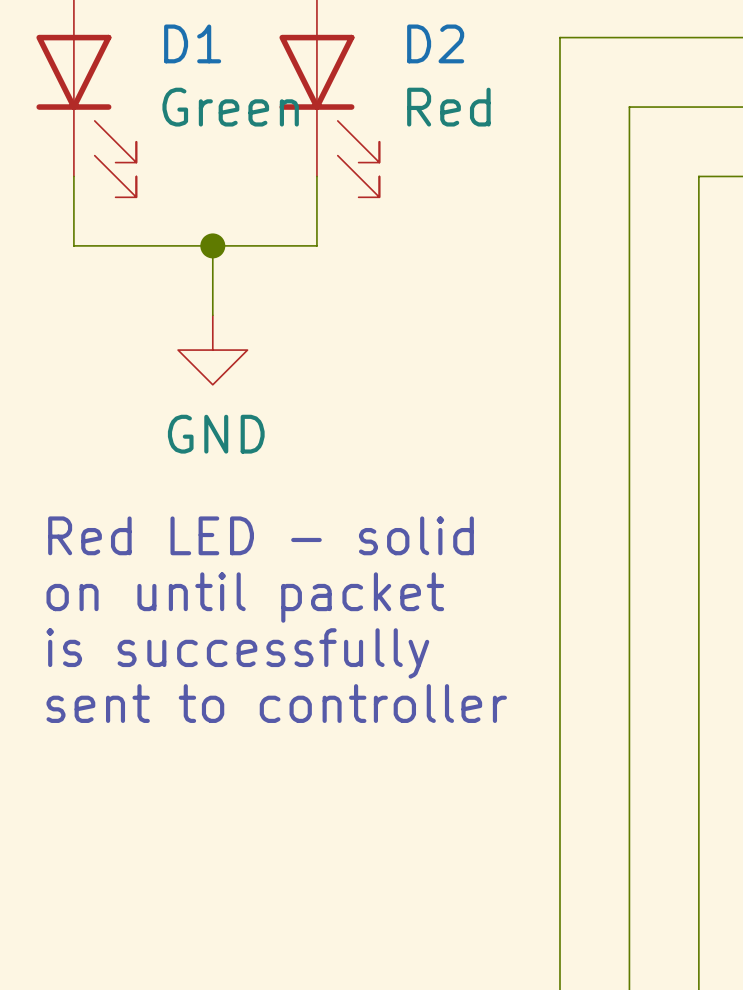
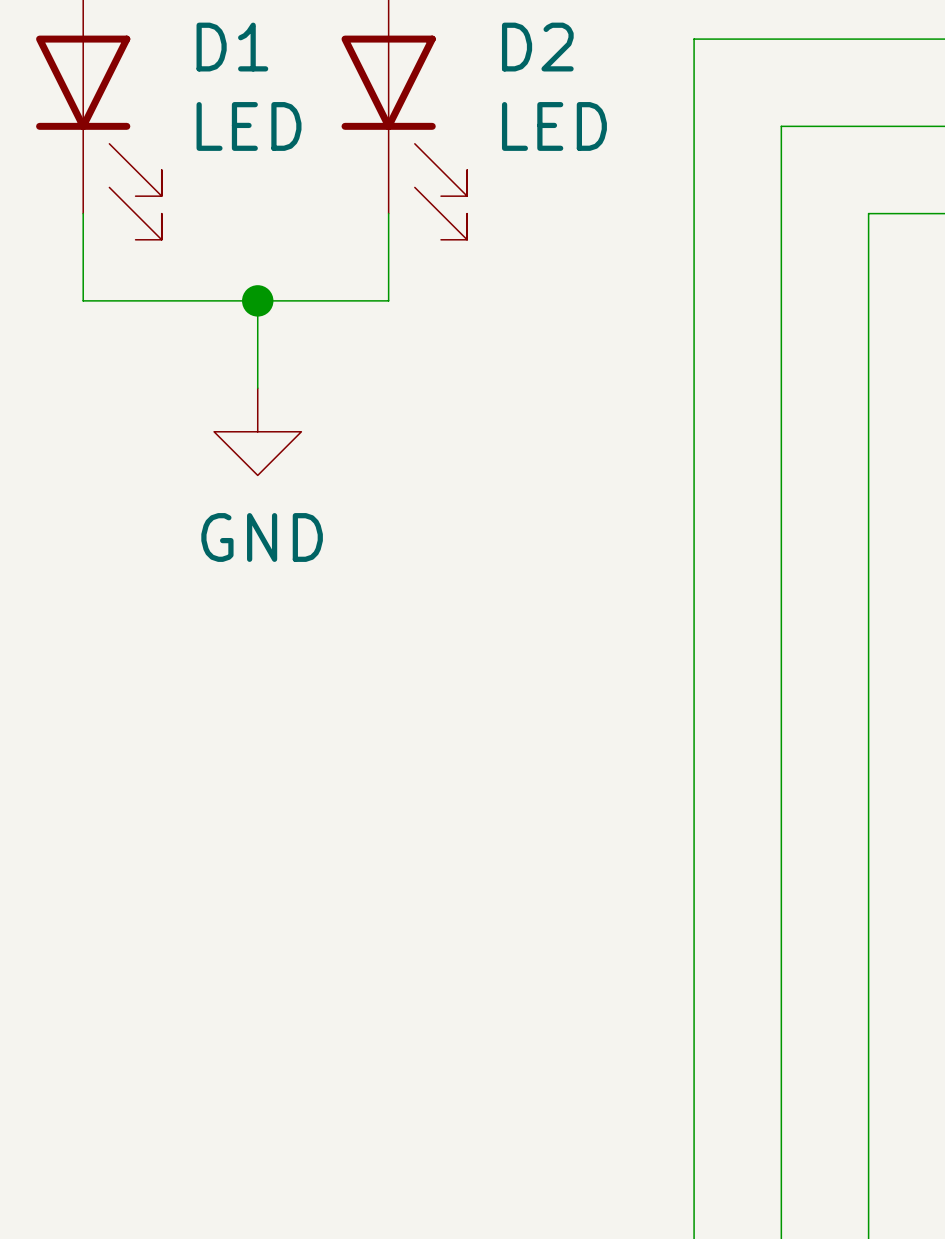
D1 value: Green (230, 107) -> LED (249, 126)
D2 value: Red (448, 107) -> LED (554, 126)
text: Red LED - solid (261, 535) -> none
text: on until packet (245, 597) -> none
text: is successfully (237, 653) -> none
text: sent to controller (276, 703) -> none

